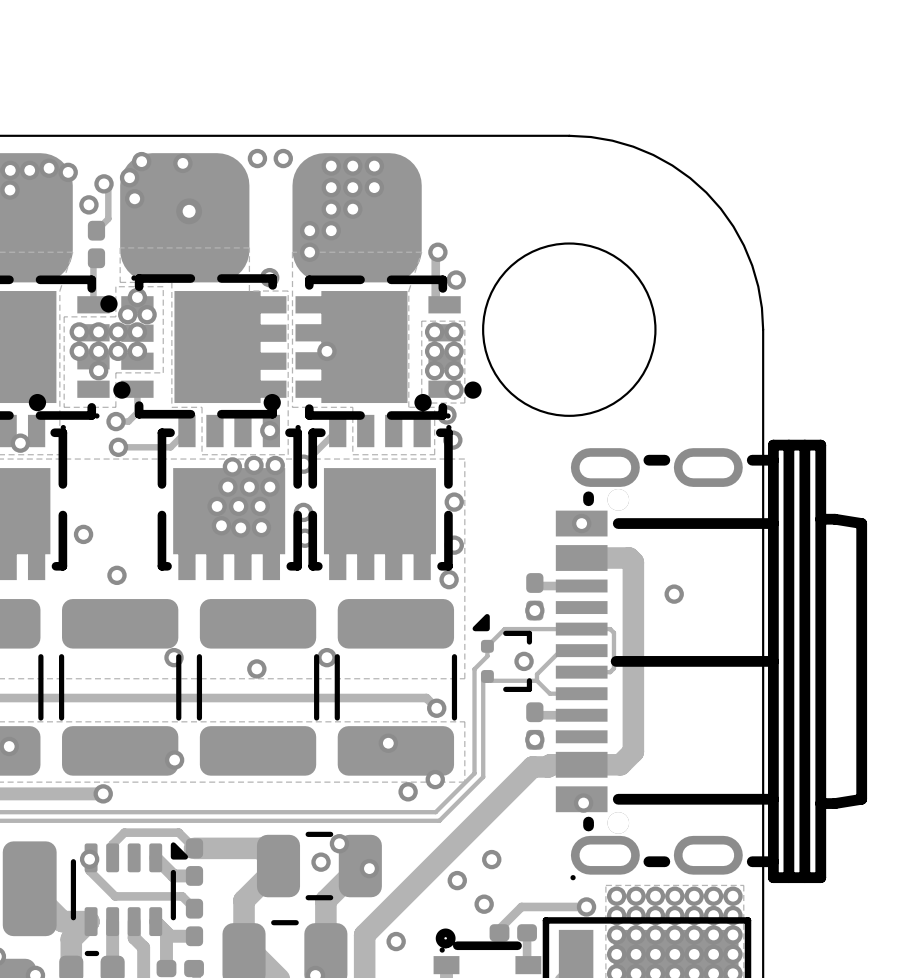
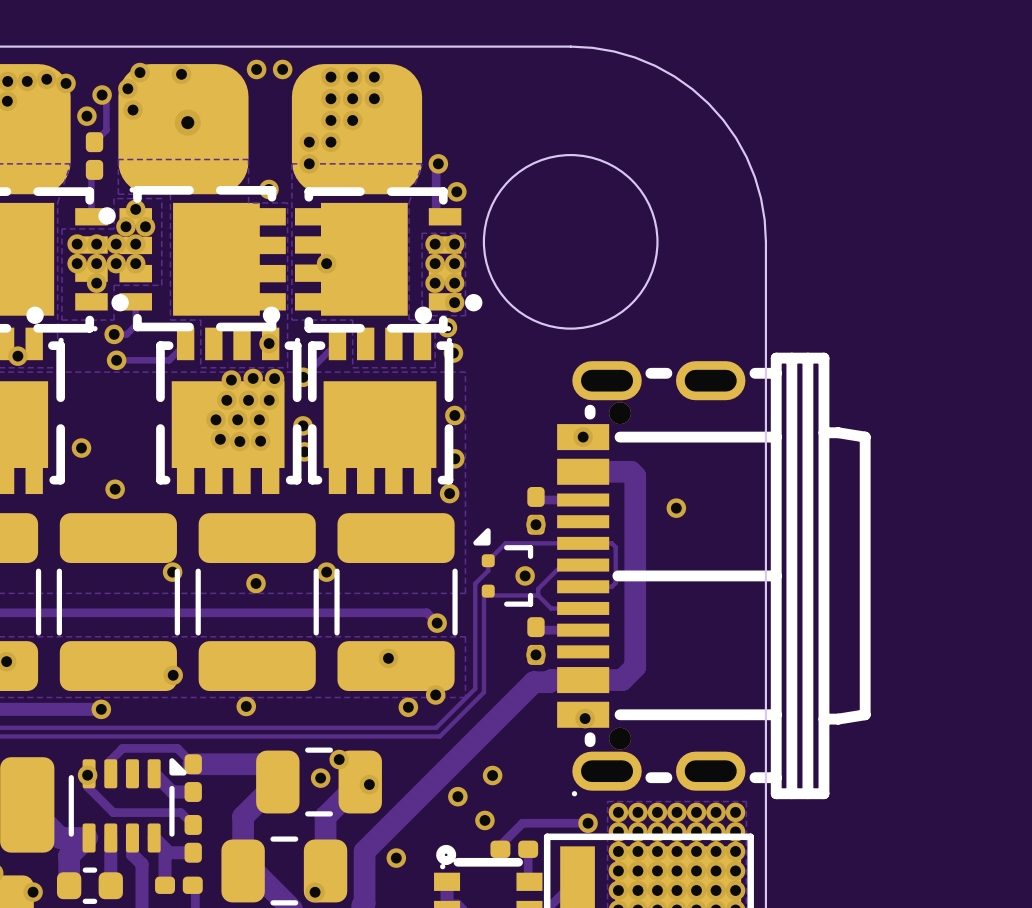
via: none -> (246, 706)

